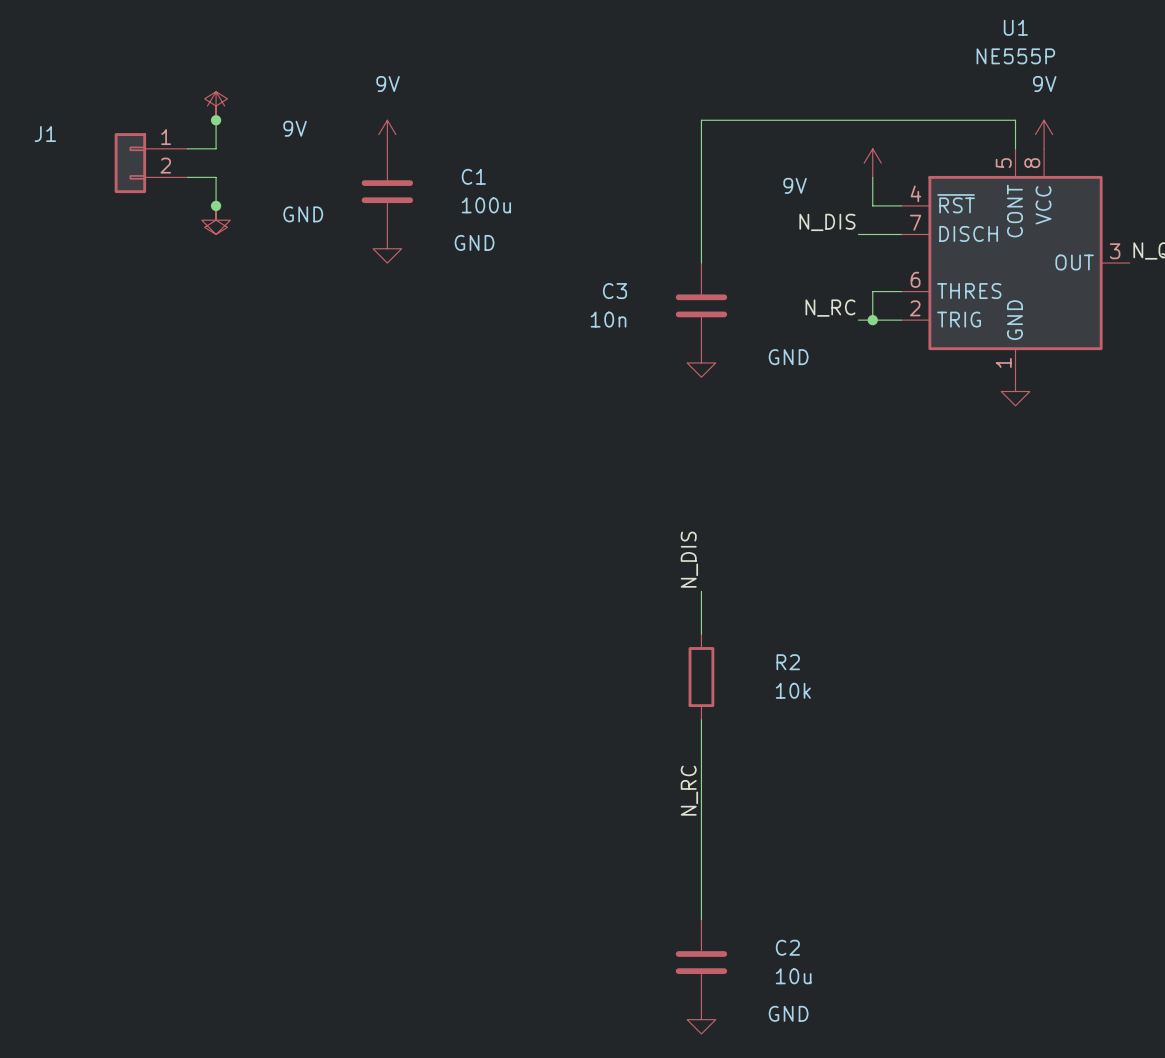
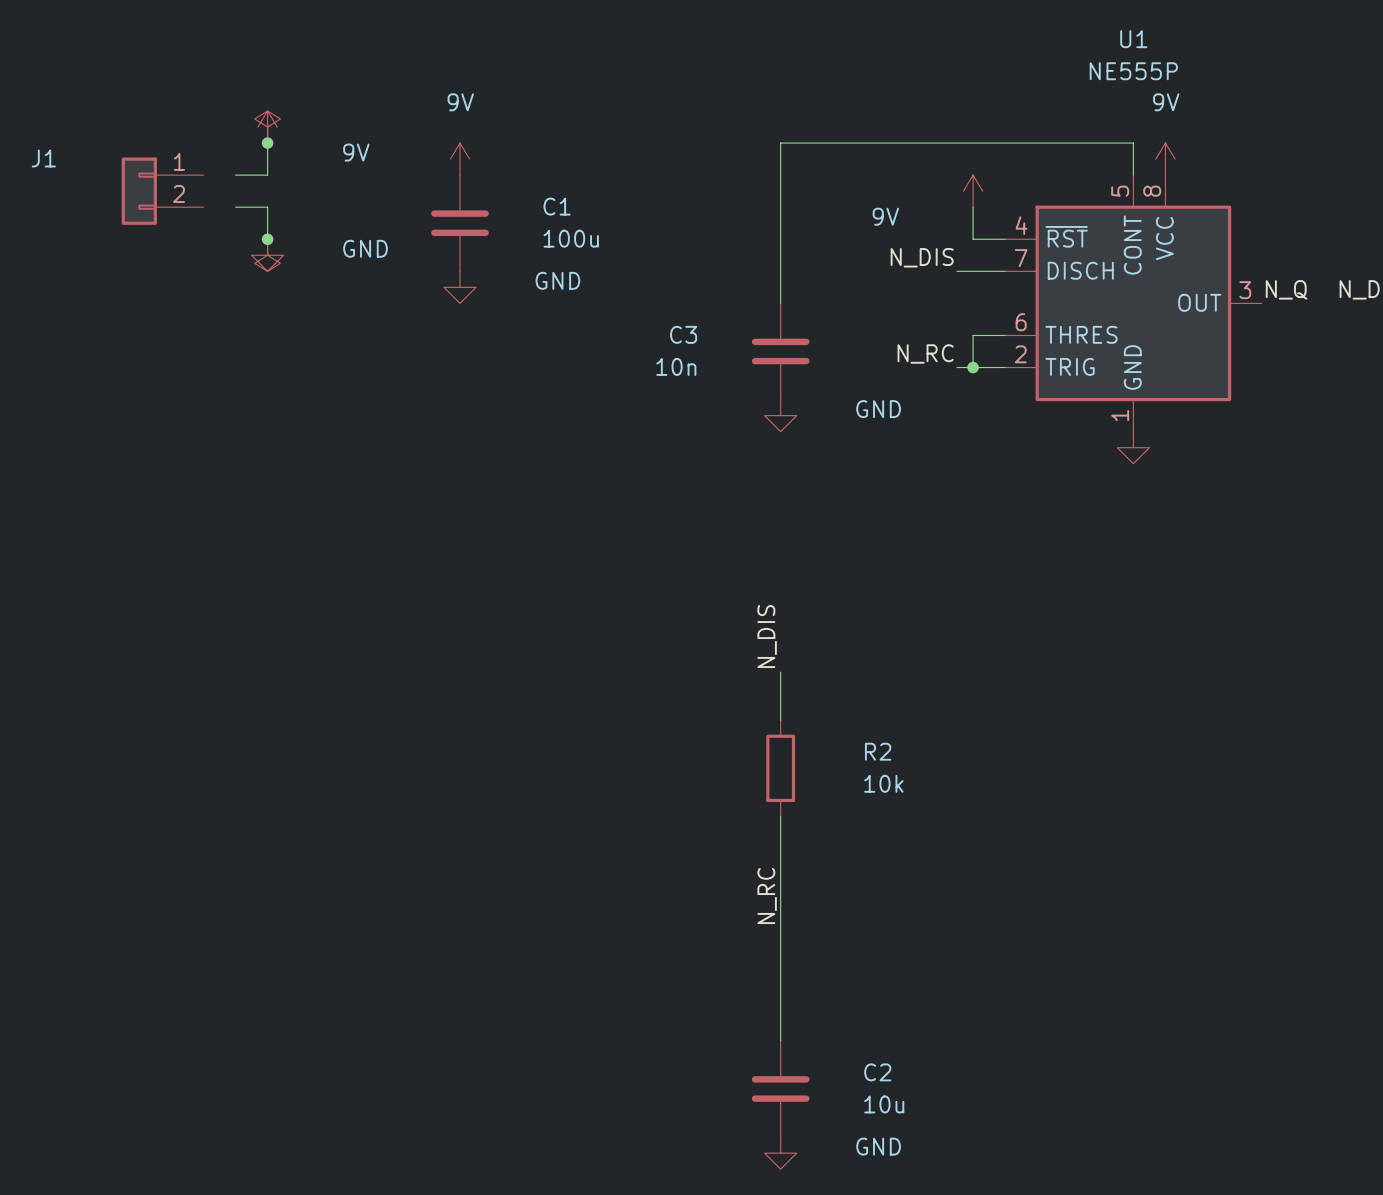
power symbol position: (216, 106) -> (267, 127)
power symbol position: 9V (216, 106) -> 9V (267, 127)
wire: (216, 120) (216, 148) (187, 148) -> (267, 143) (267, 175) (235, 175)
junction position: (216, 120) -> (267, 143)
power symbol position: 9V (387, 134) -> 9V (460, 159)
wire: (187, 177) (216, 177) (216, 205) -> (235, 207) (267, 207) (267, 239)
C1 position: (387, 191) -> (460, 223)
junction position: (216, 205) -> (267, 239)
power symbol position: (216, 220) -> (267, 255)
power symbol position: GND (216, 220) -> GND (267, 255)
power symbol position: GND (387, 248) -> GND (460, 287)

